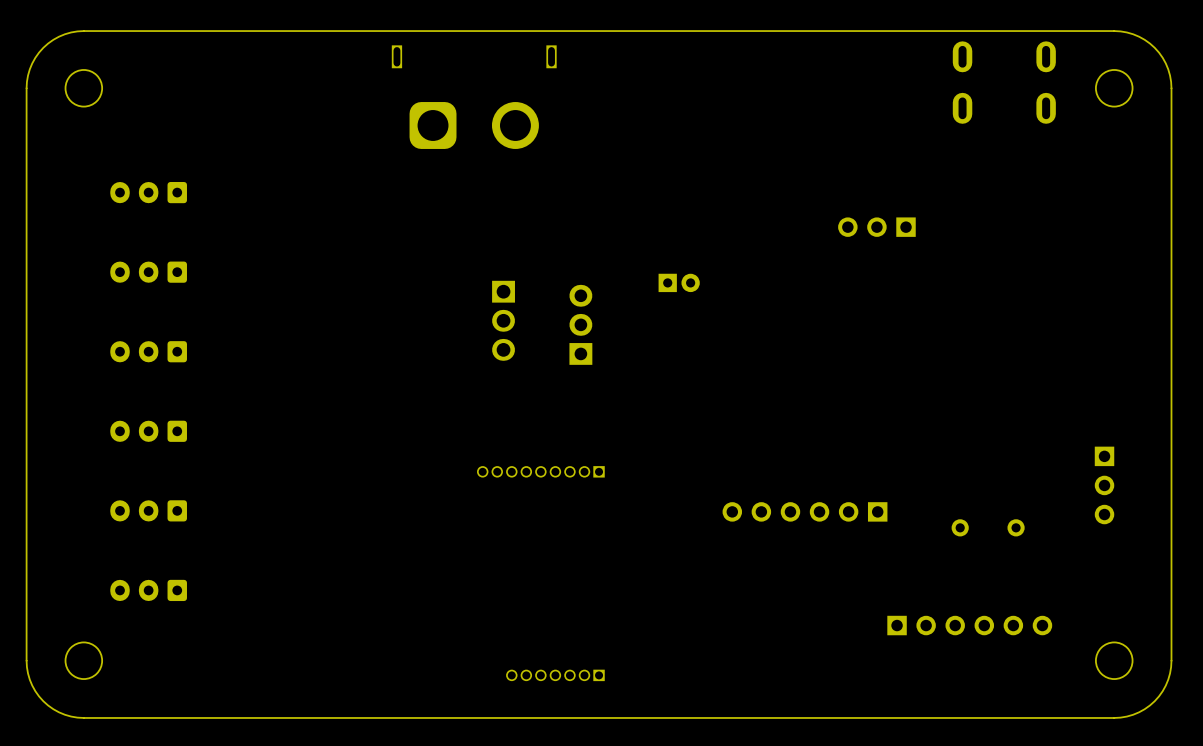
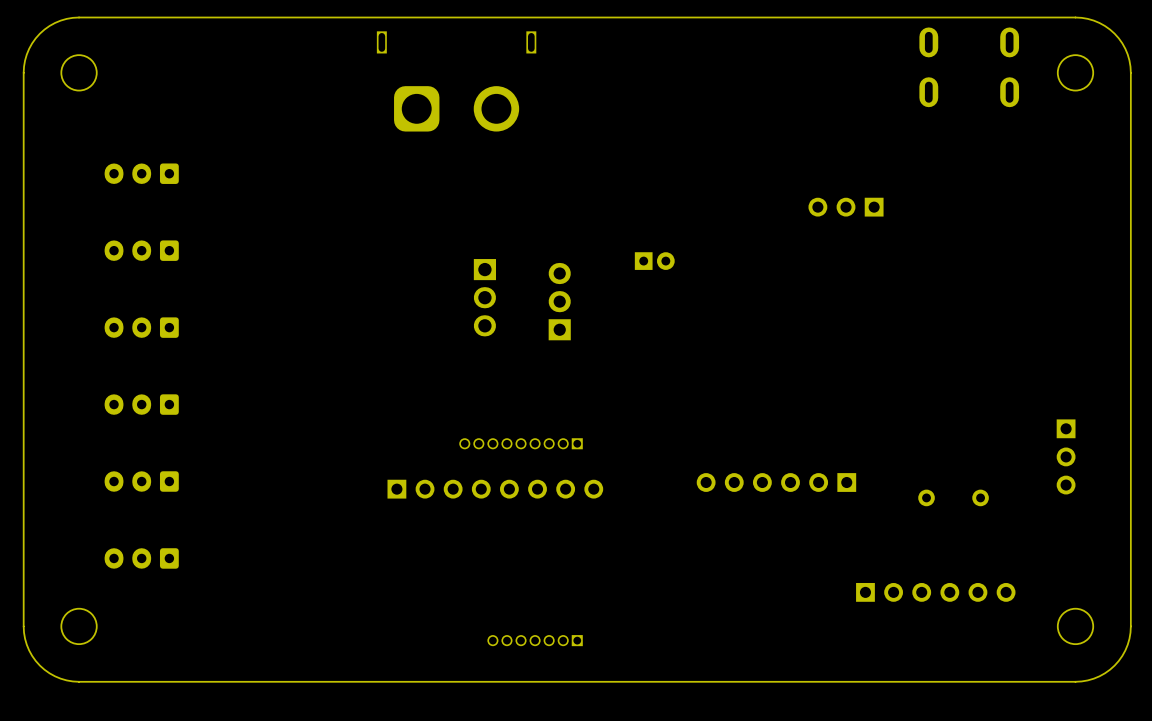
part: none -> (495, 489)

